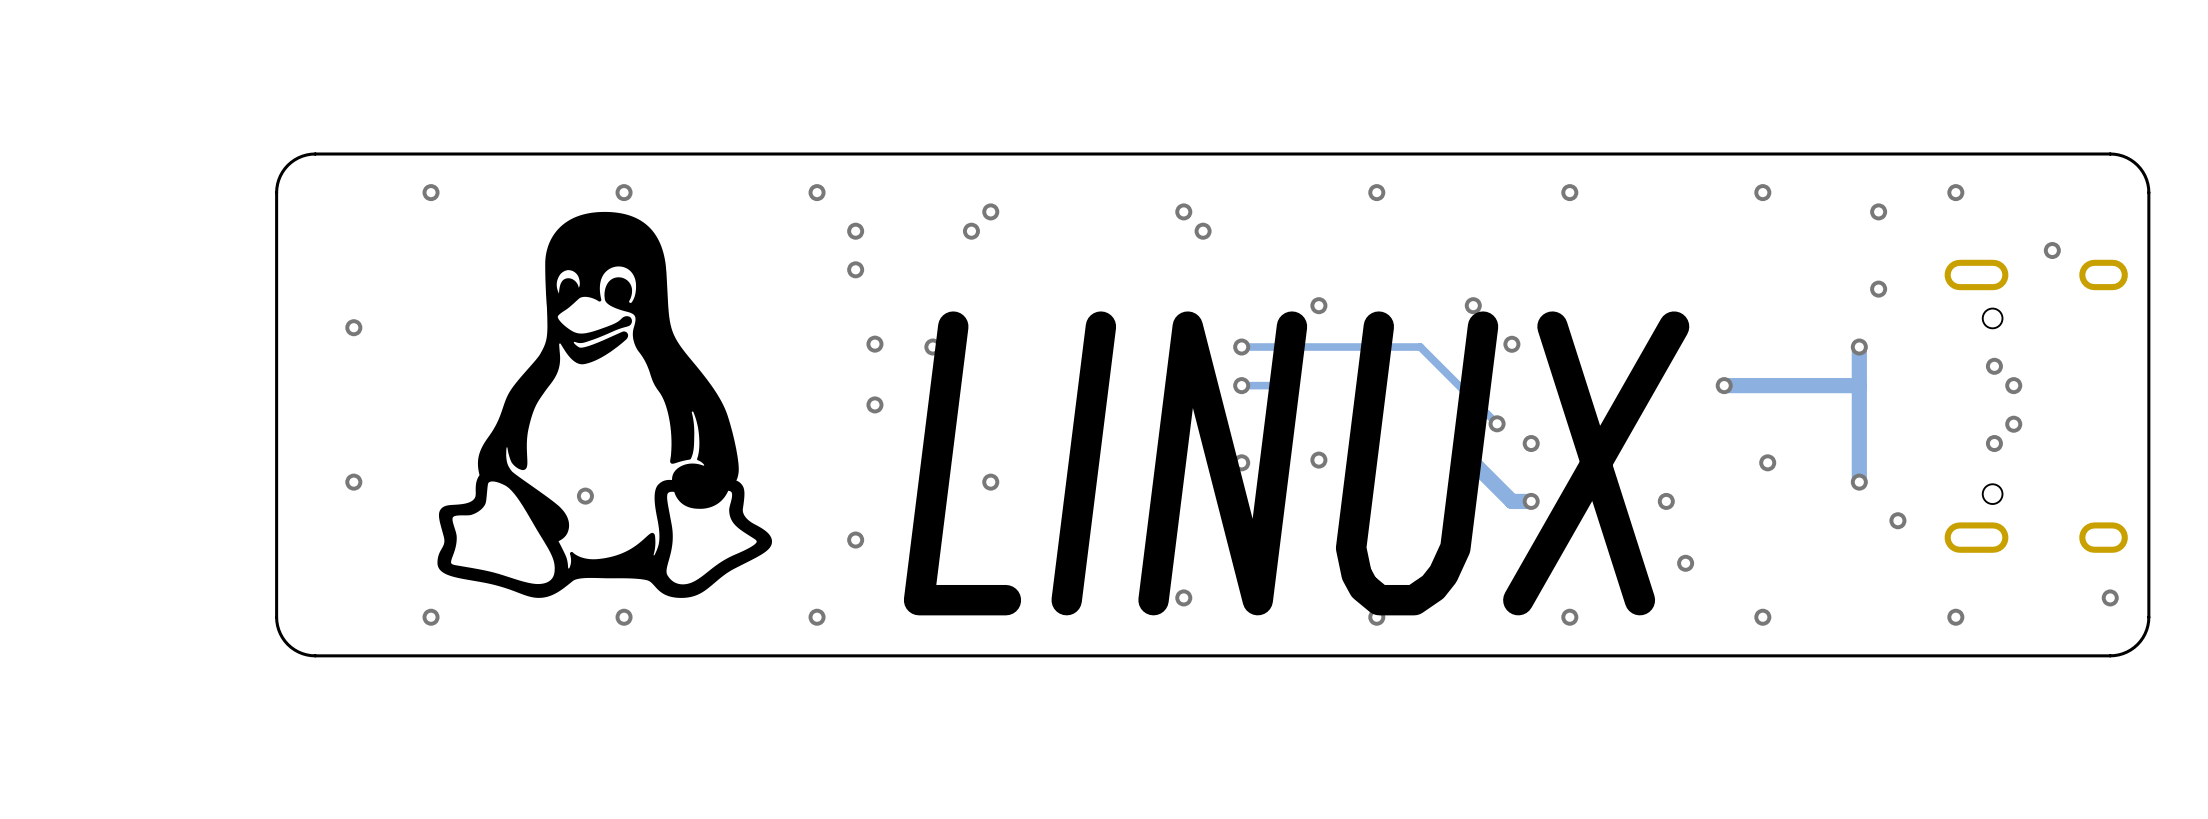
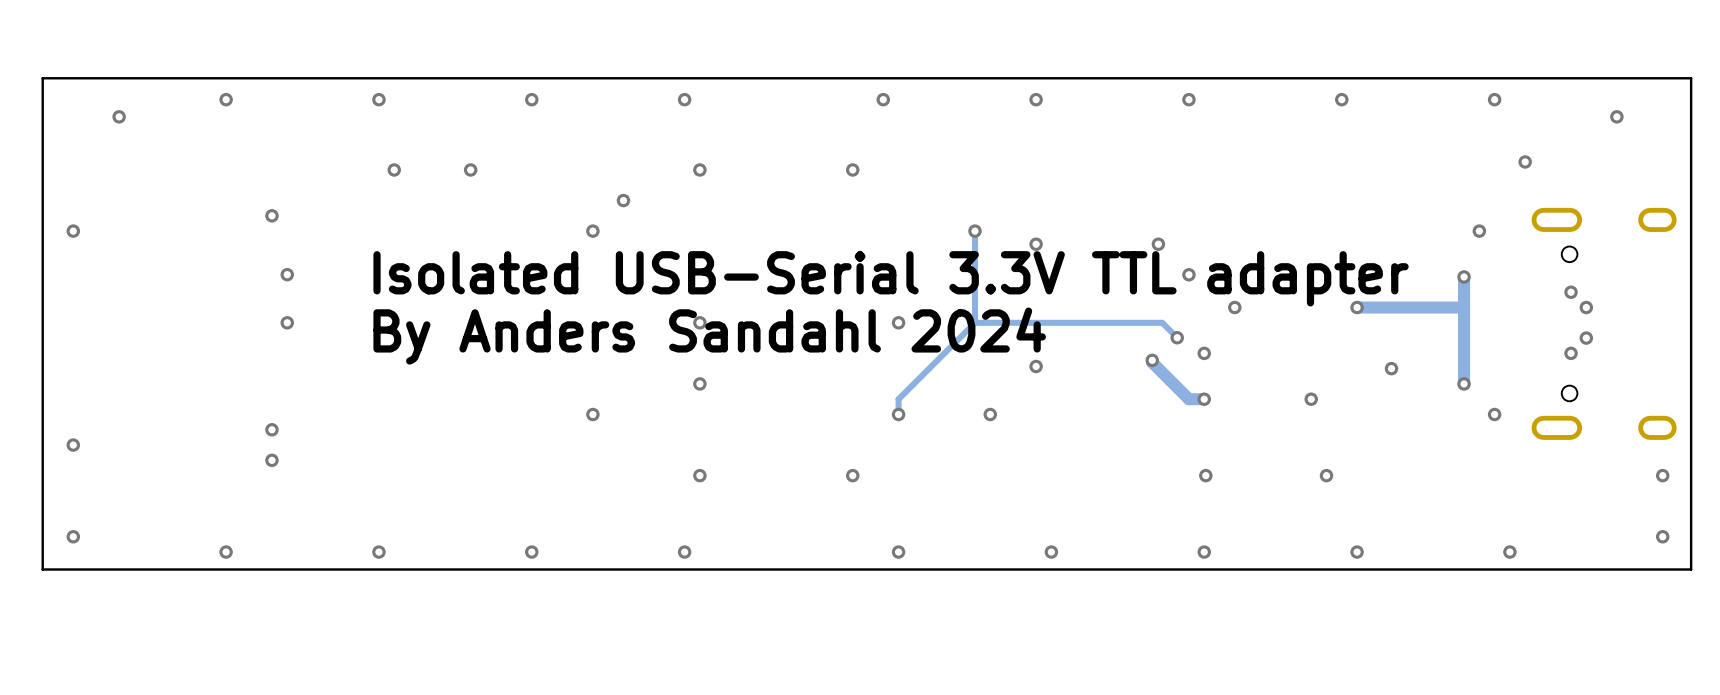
via: none -> (226, 99)
via: none -> (378, 99)
via: none -> (531, 99)
via: none -> (684, 99)
via: none -> (883, 99)
via: none -> (1036, 99)
via: none -> (1188, 99)
via: none -> (1341, 99)
via: none -> (1494, 99)
via: none -> (119, 116)
via: none -> (1616, 116)
board edge: (2110, 154) (306, 154) (287, 165) (280, 175) (276, 188) (277, 625) (282, 637) (291, 647) (302, 653) (315, 655) (2118, 654) (2130, 649) (2140, 641) (2148, 621) (2148, 192) (2146, 179) (2137, 165) (2122, 156) (2110, 154) -> (1691, 78) (1691, 569) (42, 569) (42, 78) (1691, 78)
via: (431, 192) -> none
via position: (624, 192) -> (470, 169)
via: (817, 192) -> none
via: (1376, 192) -> none
via: (1569, 192) -> none
via: (1762, 192) -> none
via position: (1955, 192) -> (1525, 161)
drawing: [437, 211, 773, 598] -> none
via: none -> (394, 169)
via: none -> (699, 169)
via: (990, 211) -> none
via: none -> (852, 169)
via: (1183, 211) -> none
via: (1878, 211) -> none
via: (855, 231) -> none
via: (971, 231) -> none
via: (1203, 231) -> none
via: none -> (623, 200)
via: (2052, 250) -> none
via: none -> (271, 215)
via: (855, 269) -> none
via: none -> (73, 231)
via: none -> (592, 231)
track: none -> (974, 231) (974, 322)
via: none -> (974, 231)
via position: (353, 327) -> (287, 274)
via: (874, 344) -> none
via: (932, 347) -> none
track: (1241, 347) (1420, 347) (1478, 404) -> (974, 322) (1162, 322)
via: (1241, 347) -> none
text: none -> Isolated USB-Serial 3.3V TTL adapter (891, 278)
via: (1241, 385) -> none
track: (1280, 385) (1241, 385) -> none
via: none -> (287, 322)
via position: (874, 404) -> (699, 322)
via: none -> (898, 322)
track: none -> (974, 322) (898, 399) (898, 414)
text: none -> By Anders Sandahl 2024 (709, 336)
via: (1241, 462) -> none
text: LINUX (1296, 463) -> none
via: (353, 482) -> none
via: none -> (699, 383)
via: (990, 482) -> none
via: (585, 496) -> none
via: none -> (592, 414)
via: none -> (898, 414)
via: none -> (990, 414)
via: none -> (271, 429)
via: (855, 540) -> none
via: none -> (73, 445)
via position: (1685, 563) -> (1326, 475)
via: none -> (271, 460)
via: none -> (699, 475)
via: none -> (852, 475)
via: (1183, 597) -> none
via: none -> (1205, 475)
via: (431, 617) -> none
via: (624, 617) -> none
via: (817, 617) -> none
via: (1376, 617) -> none
via: (1569, 617) -> none
via: (1762, 617) -> none
via: (1955, 617) -> none
via: none -> (73, 536)
via: none -> (1662, 536)
via: none -> (226, 552)
via: none -> (378, 552)
via: none -> (531, 552)
via: none -> (684, 552)
via: none -> (898, 552)
via: none -> (1051, 552)
via: none -> (1204, 552)
via: none -> (1357, 552)
via: none -> (1509, 552)

